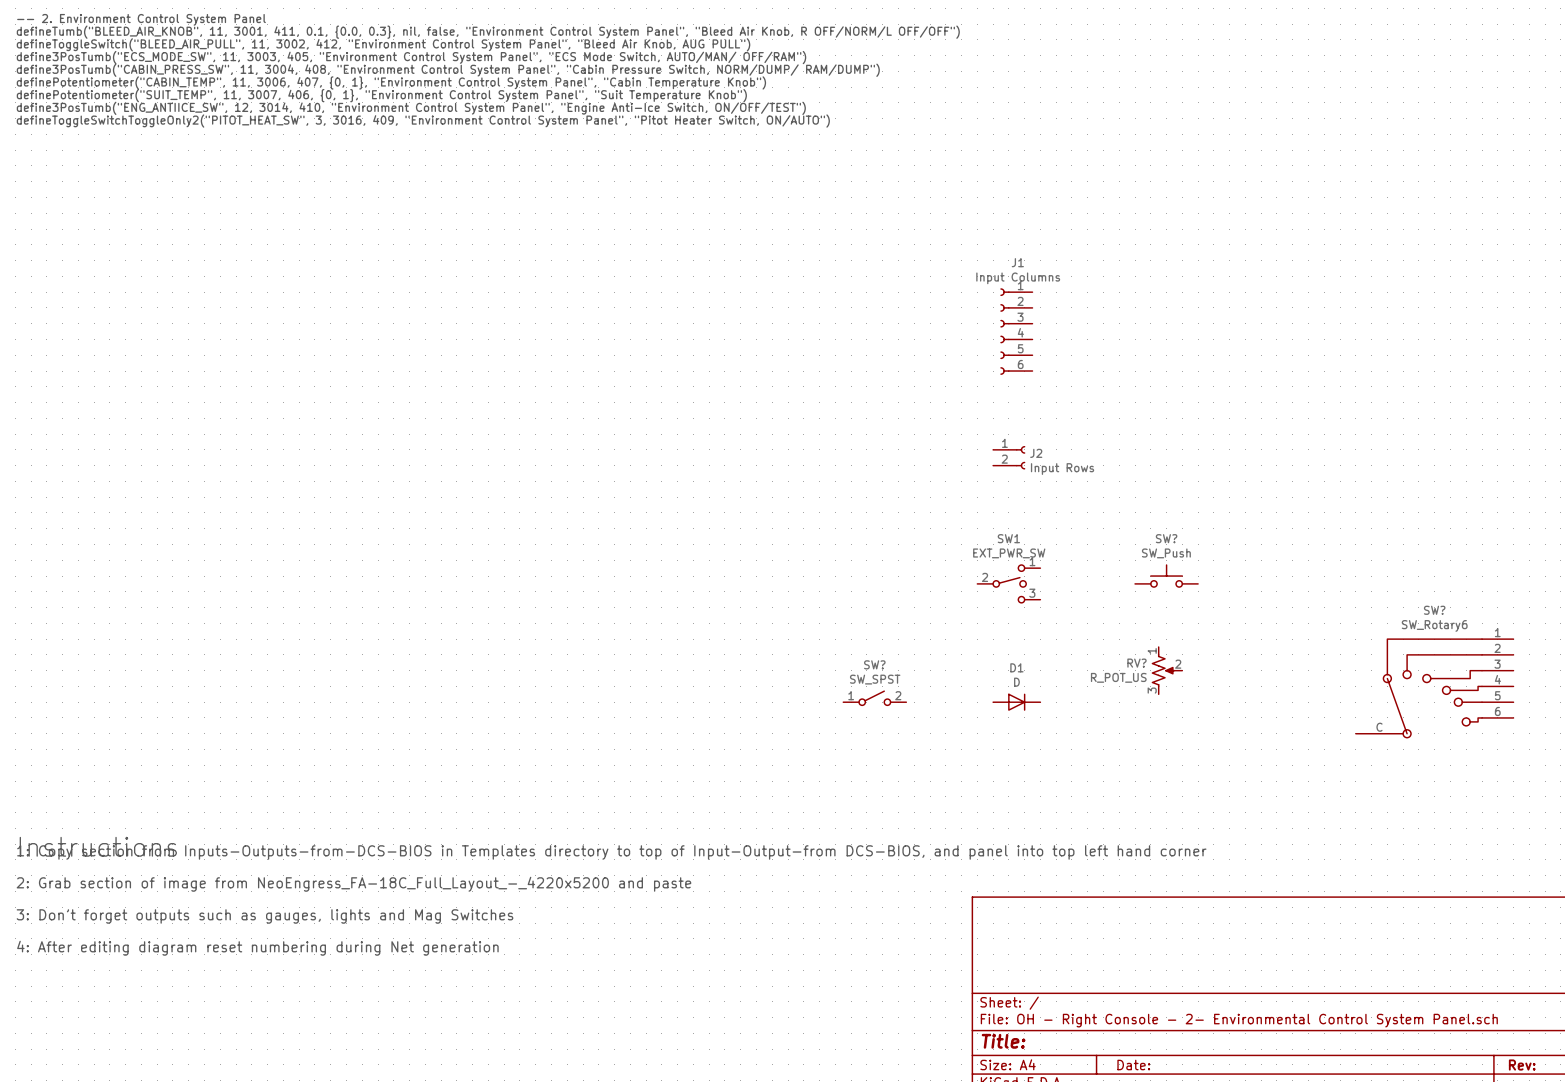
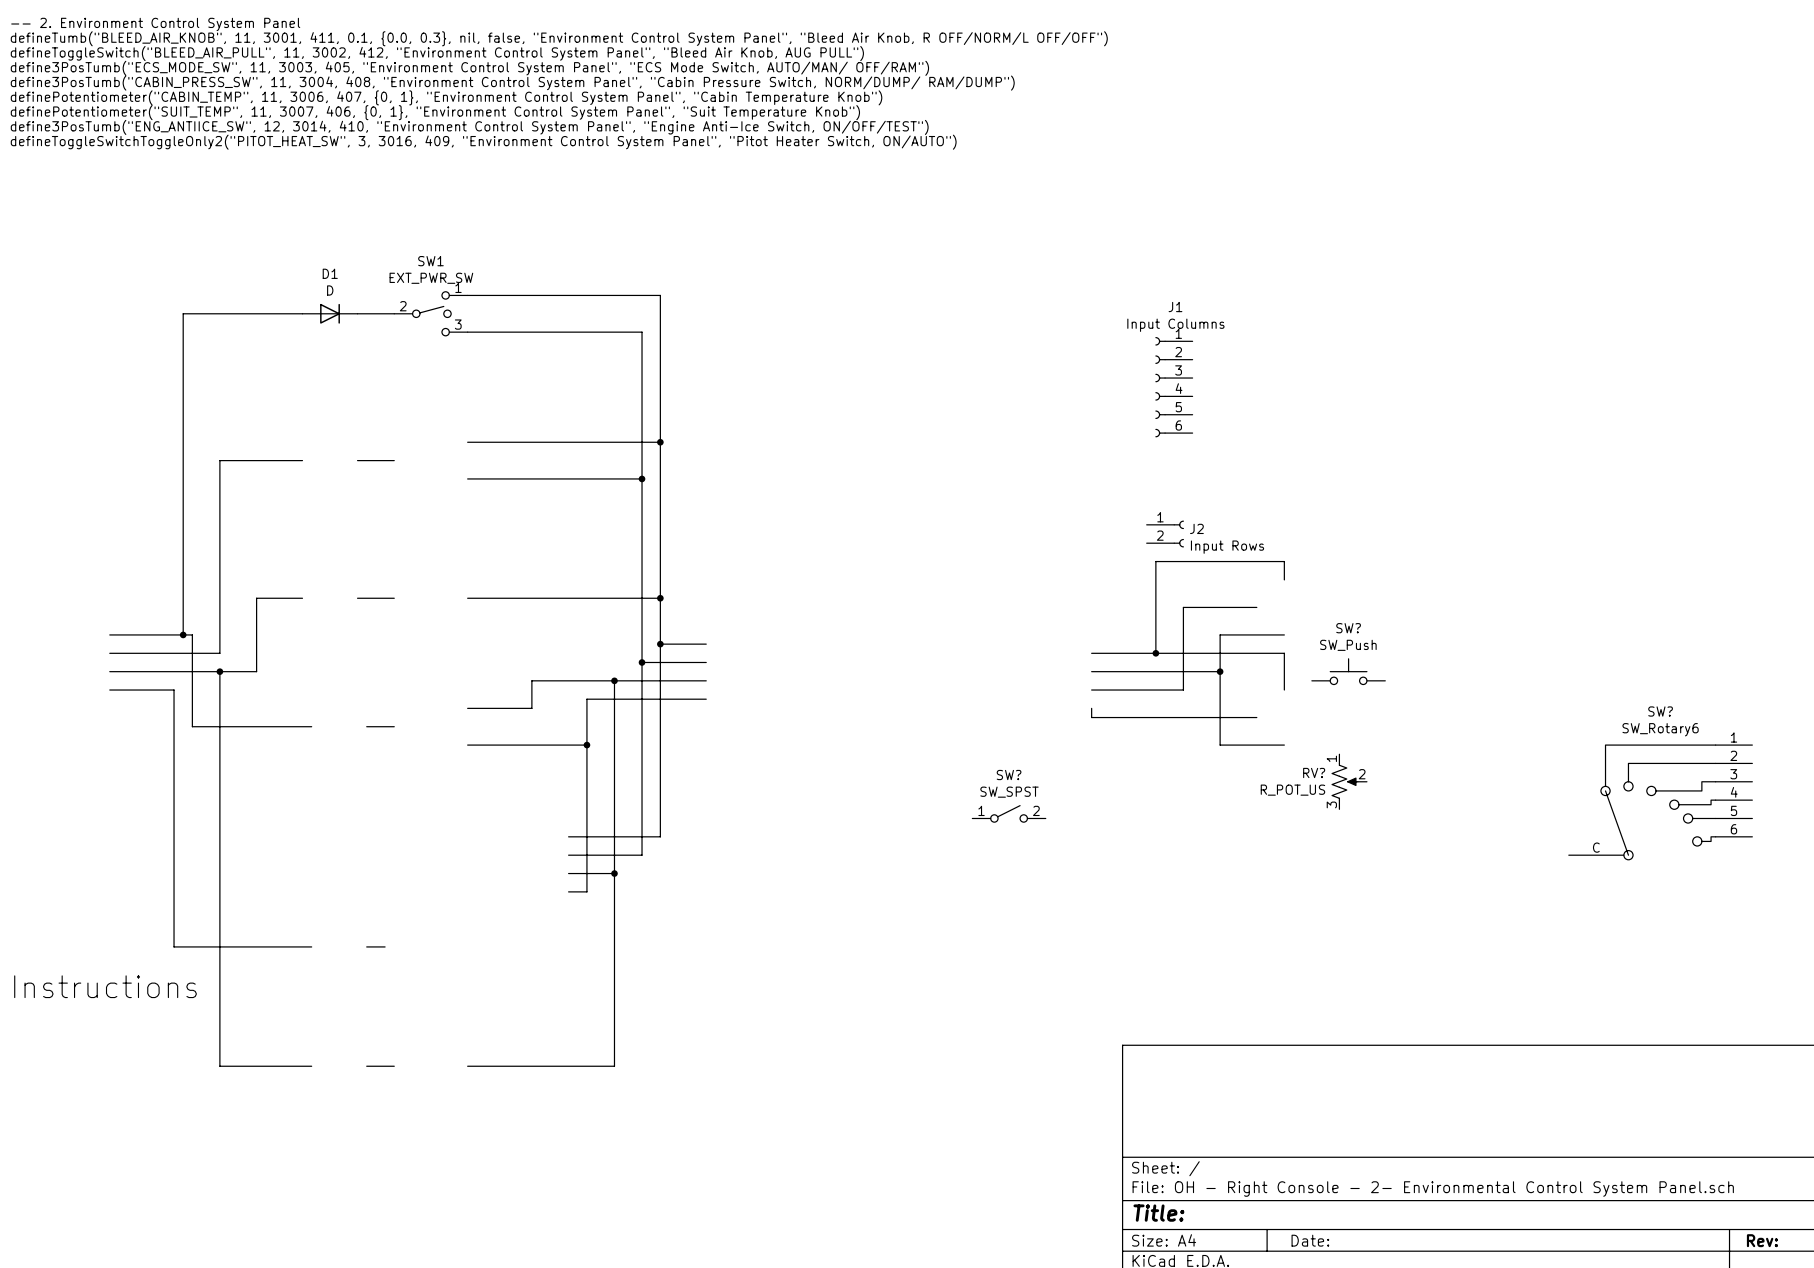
wire: none -> (467, 295) (660, 295) (660, 836) (568, 836)
wire: none -> (302, 313) (183, 313) (183, 634)
wire: none -> (357, 313) (394, 313)
wire: none -> (467, 332) (642, 332) (642, 855) (568, 855)
wire: none -> (467, 442) (660, 442)
junction: none -> (660, 442)
wire: none -> (302, 460) (219, 460) (219, 653) (109, 653)
wire: none -> (357, 460) (394, 460)
wire: none -> (467, 478) (642, 478)
junction: none -> (642, 478)
wire: none -> (1284, 579) (1284, 561) (1155, 561) (1155, 653)
wire: none -> (302, 598) (256, 598) (256, 671) (109, 671)
wire: none -> (357, 598) (394, 598)
wire: none -> (467, 598) (660, 598)
junction: none -> (660, 598)
wire: none -> (1256, 607) (1183, 607) (1183, 690) (1091, 690)
wire: none -> (109, 634) (192, 634) (192, 726) (311, 726)
junction: none -> (183, 634)
wire: none -> (1284, 634) (1220, 634) (1220, 745) (1284, 745)
wire: none -> (660, 644) (706, 644)
junction: none -> (660, 644)
wire: none -> (1091, 653) (1284, 653) (1284, 690)
junction: none -> (1155, 653)
wire: none -> (642, 662) (706, 662)
junction: none -> (642, 662)
wire: none -> (219, 671) (219, 1066) (311, 1066)
junction: none -> (219, 671)
wire: none -> (1091, 671) (1220, 671)
junction: none -> (1220, 671)
wire: none -> (614, 680) (614, 1066) (467, 1066)
junction: none -> (614, 680)
wire: none -> (706, 680) (531, 680) (531, 708) (467, 708)
SW1 position: (1008, 583) -> (430, 313)
wire: none -> (109, 690) (174, 690) (174, 946) (311, 946)
wire: none -> (706, 699) (586, 699) (586, 891) (568, 891)
wire: none -> (1091, 708) (1091, 717) (1256, 717)
wire: none -> (366, 726) (394, 726)
wire: none -> (467, 745) (586, 745)
junction: none -> (586, 745)
D1 position: (1016, 702) -> (330, 313)
wire: none -> (568, 873) (614, 873)
junction: none -> (614, 873)
wire: none -> (366, 946) (385, 946)
text: 1: Copy section from Inputs-Outputs-from-DCS-BIOS in Templates directory to top of Input-Output-from DCS-BIOS, and panel into top left hand corner (611, 852) -> none
text: 2: Grab section of image from NeoEngress_FA-18C_Full_Layout_-_4220x5200 and paste (353, 884) -> none
wire: none -> (366, 1066) (394, 1066)
text: 3: Don’t forget outputs such as gauges, lights and Mag Switches (265, 916) -> none
text: 4: After editing diagram reset numbering during Net generation (257, 948) -> none

